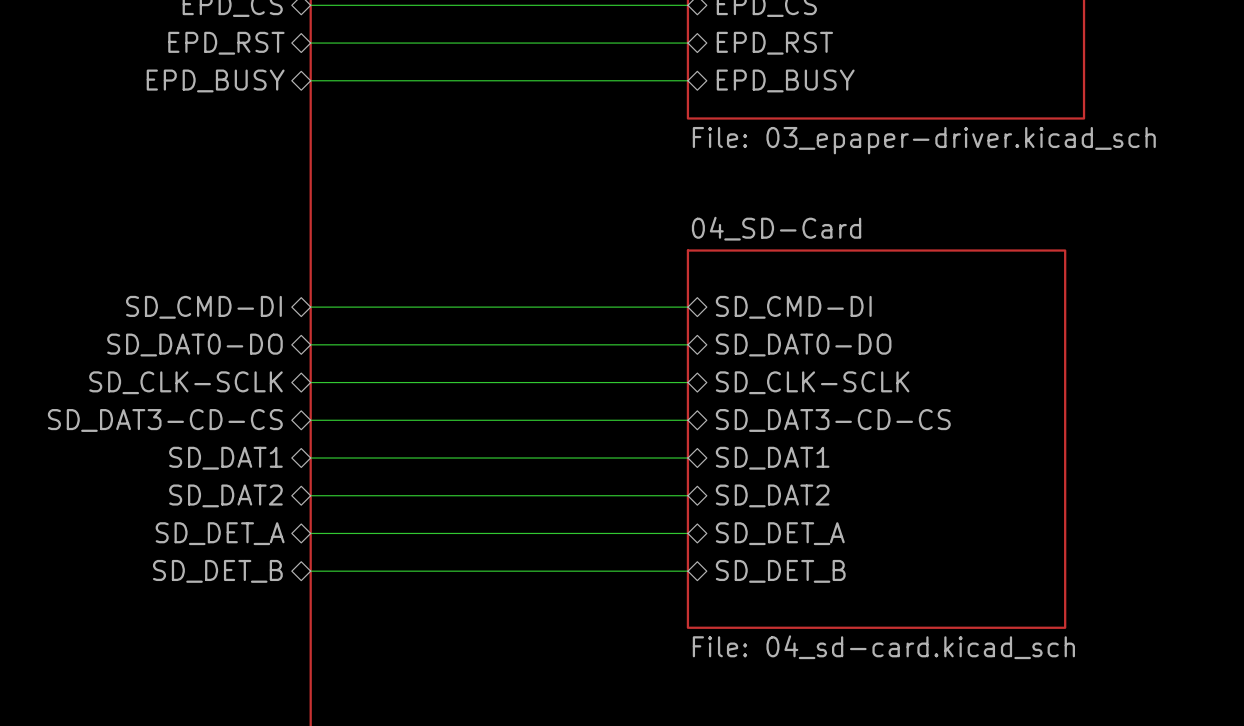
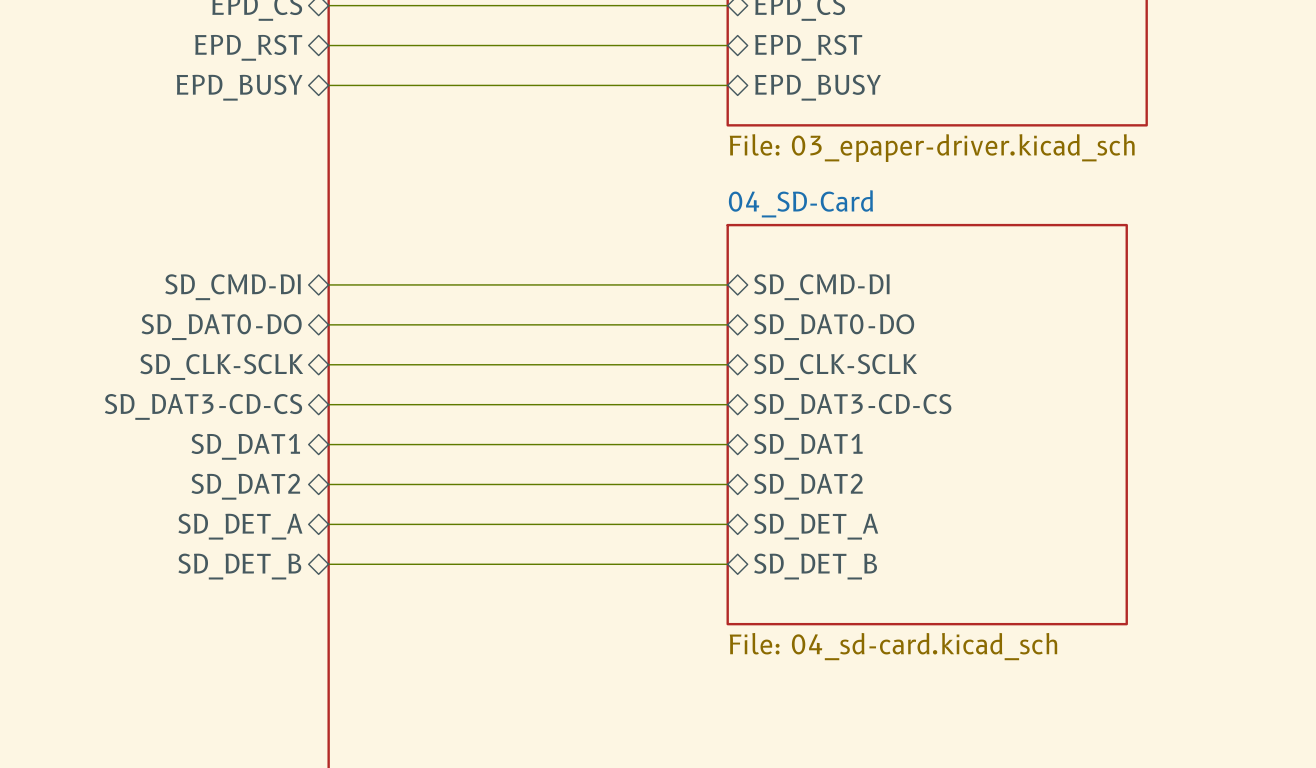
sheet pin: none -> SD_CMD-DI (232, 287)
sheet pin: none -> SD_CMD-DI (821, 287)
sheet pin: SD_CMD-DI (203, 307) -> SD_DAT0-DO (221, 327)
sheet pin: SD_CMD-DI (793, 307) -> SD_DAT0-DO (834, 327)
sheet pin: SD_DAT0-DO (194, 345) -> SD_CLK-SCLK (221, 367)
sheet pin: SD_DAT0-DO (803, 345) -> SD_CLK-SCLK (835, 367)
sheet pin: SD_CLK-SCLK (186, 382) -> SD_DAT3-CD-CS (203, 406)
sheet pin: SD_CLK-SCLK (812, 382) -> SD_DAT3-CD-CS (852, 406)
sheet pin: SD_DAT3-CD-CS (165, 420) -> SD_DAT1 (245, 446)
sheet pin: SD_DAT3-CD-CS (833, 420) -> SD_DAT1 (808, 446)
sheet 04_SD-Card position: (876, 439) -> (927, 424)
sheet pin: SD_DAT1 (225, 458) -> SD_DAT2 (245, 486)
sheet pin: SD_DAT1 (772, 458) -> SD_DAT2 (808, 486)
sheet pin: SD_DAT2 (225, 495) -> SD_DET_A (240, 526)
sheet pin: SD_DAT2 (772, 495) -> SD_DET_A (816, 526)
sheet pin: SD_DET_A (220, 533) -> SD_DET_B (239, 566)
sheet pin: SD_DET_A (780, 533) -> SD_DET_B (815, 566)
sheet pin: SD_DET_B (217, 571) -> none
wire: (310, 571) (687, 571) -> (328, 284) (727, 284)
sheet pin: SD_DET_B (780, 571) -> none

